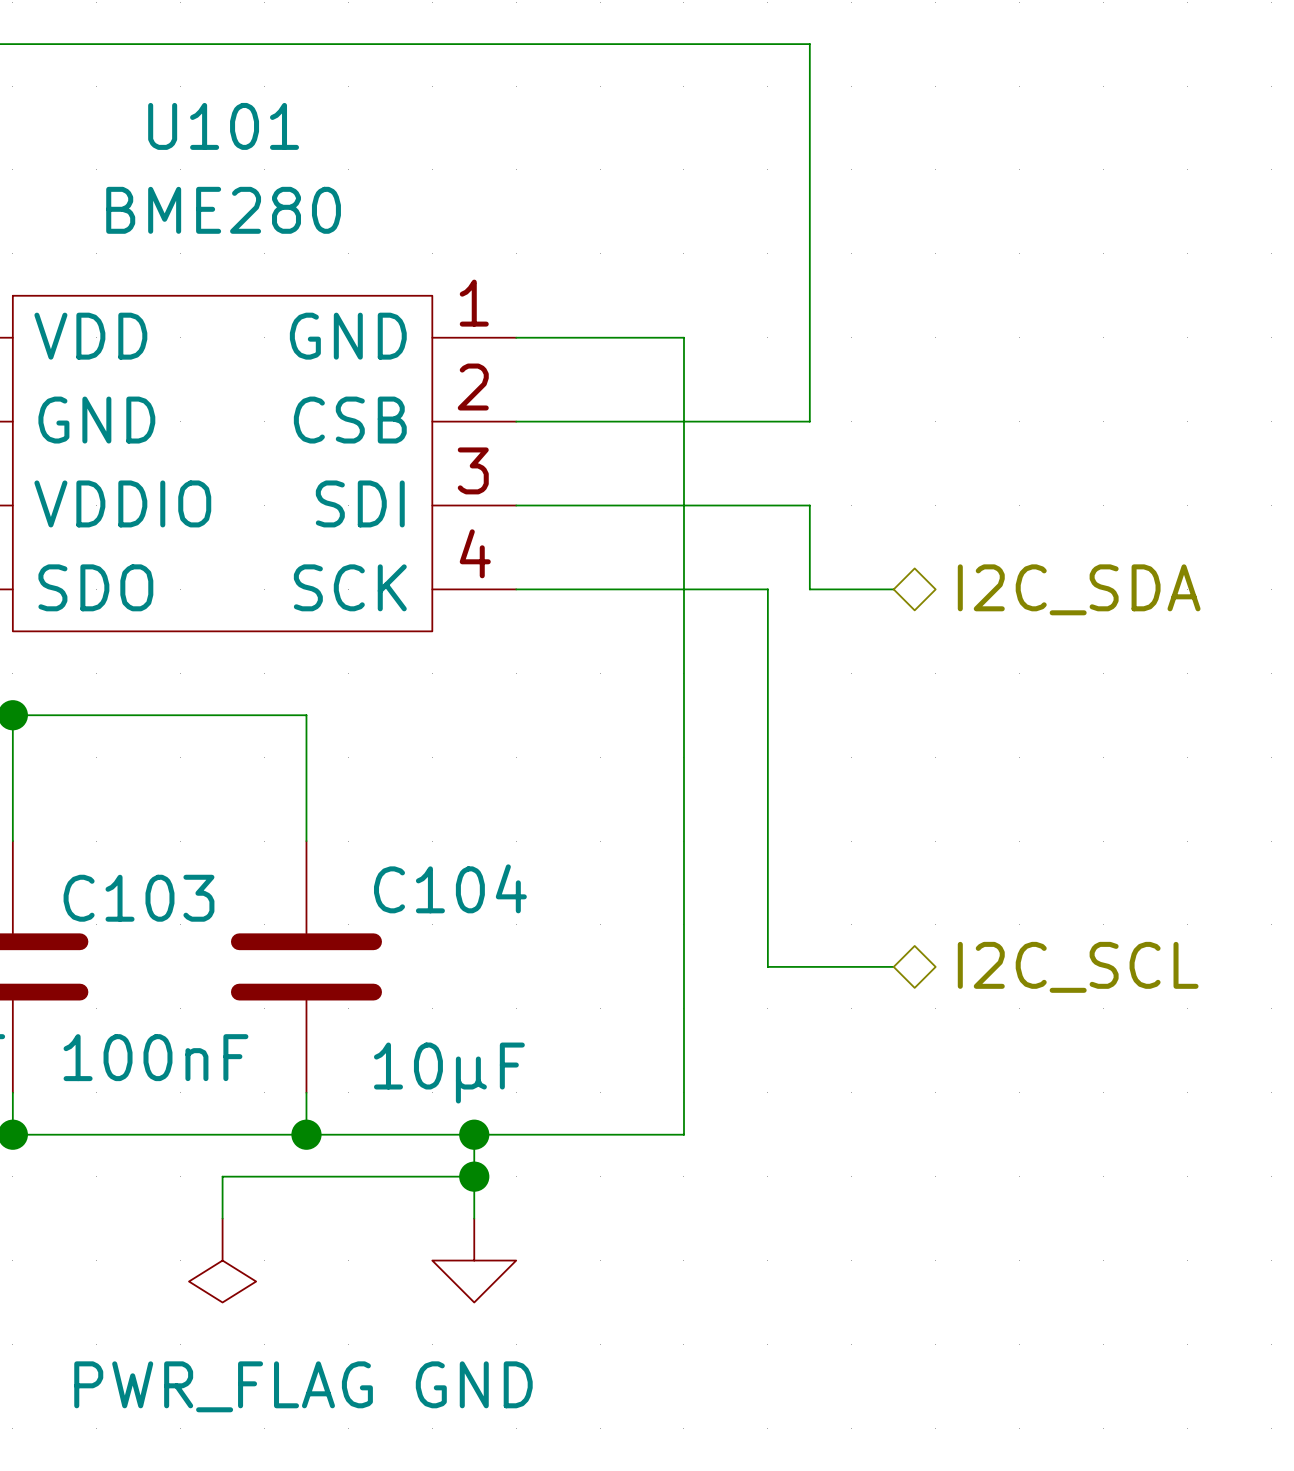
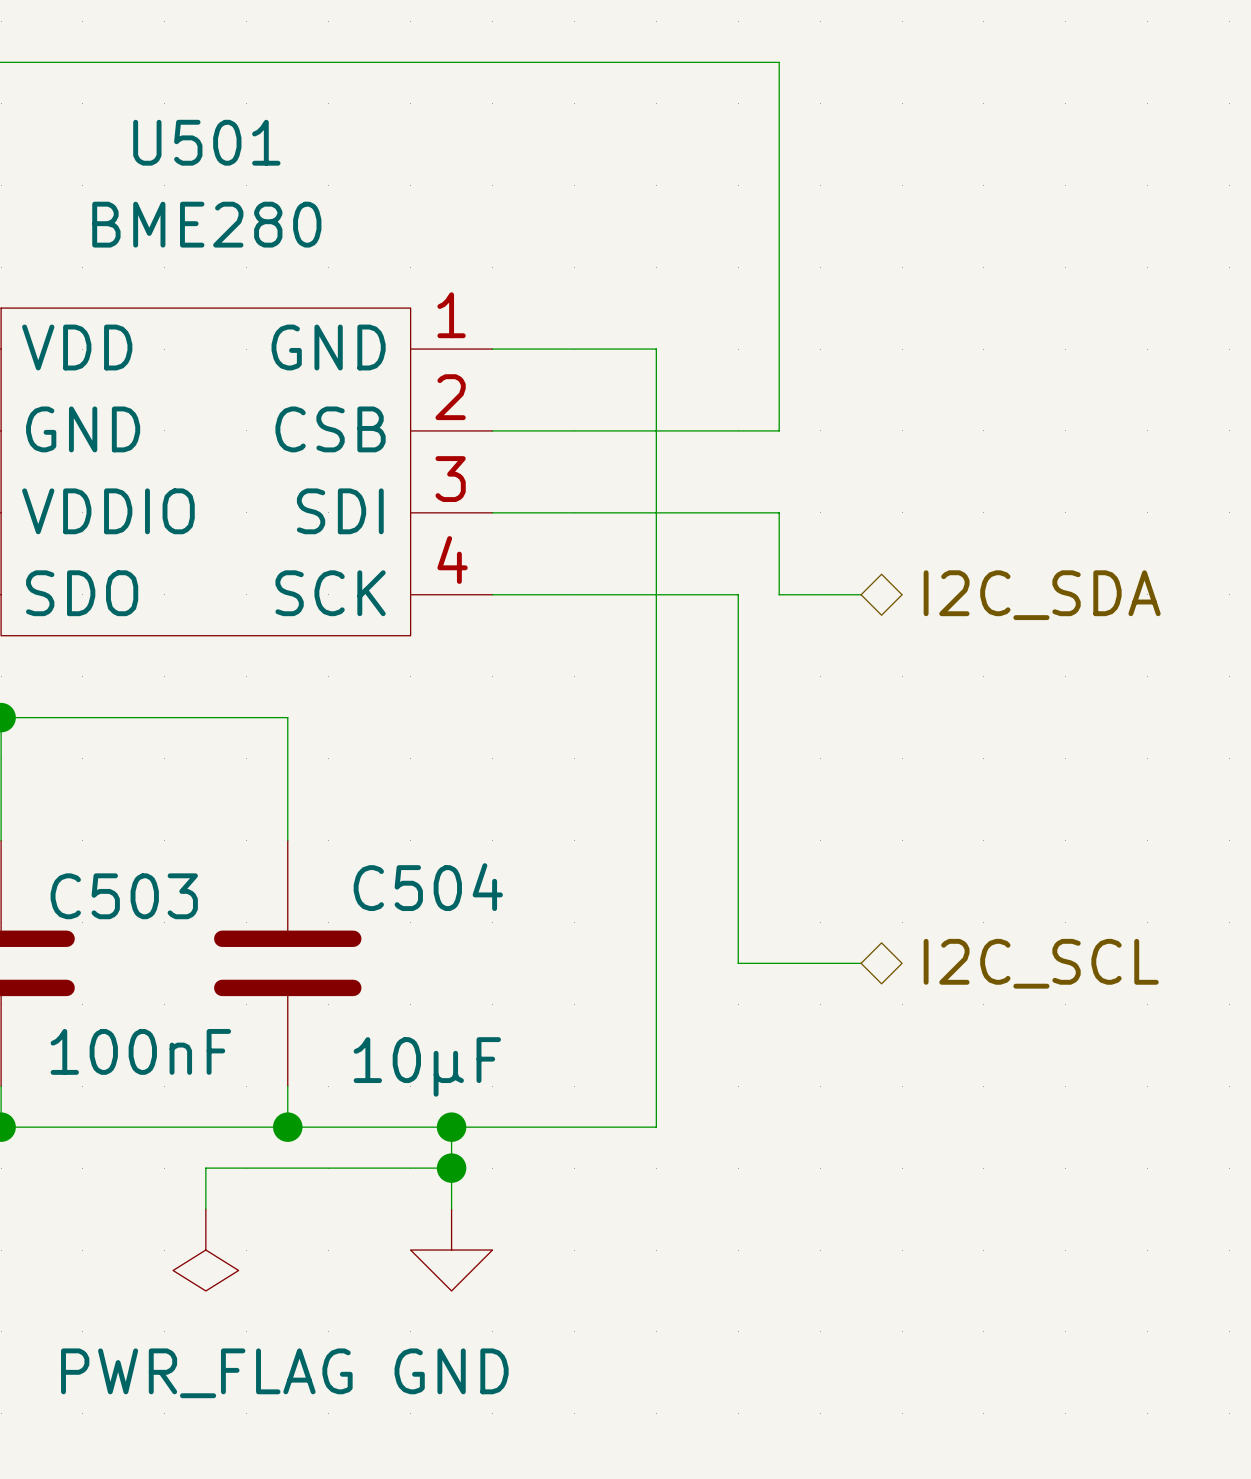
U101 name: U101 (223, 126) -> U501 (206, 142)
C104 name: C104 (450, 888) -> C504 (428, 887)
C103 name: C103 (139, 898) -> C503 (124, 896)

